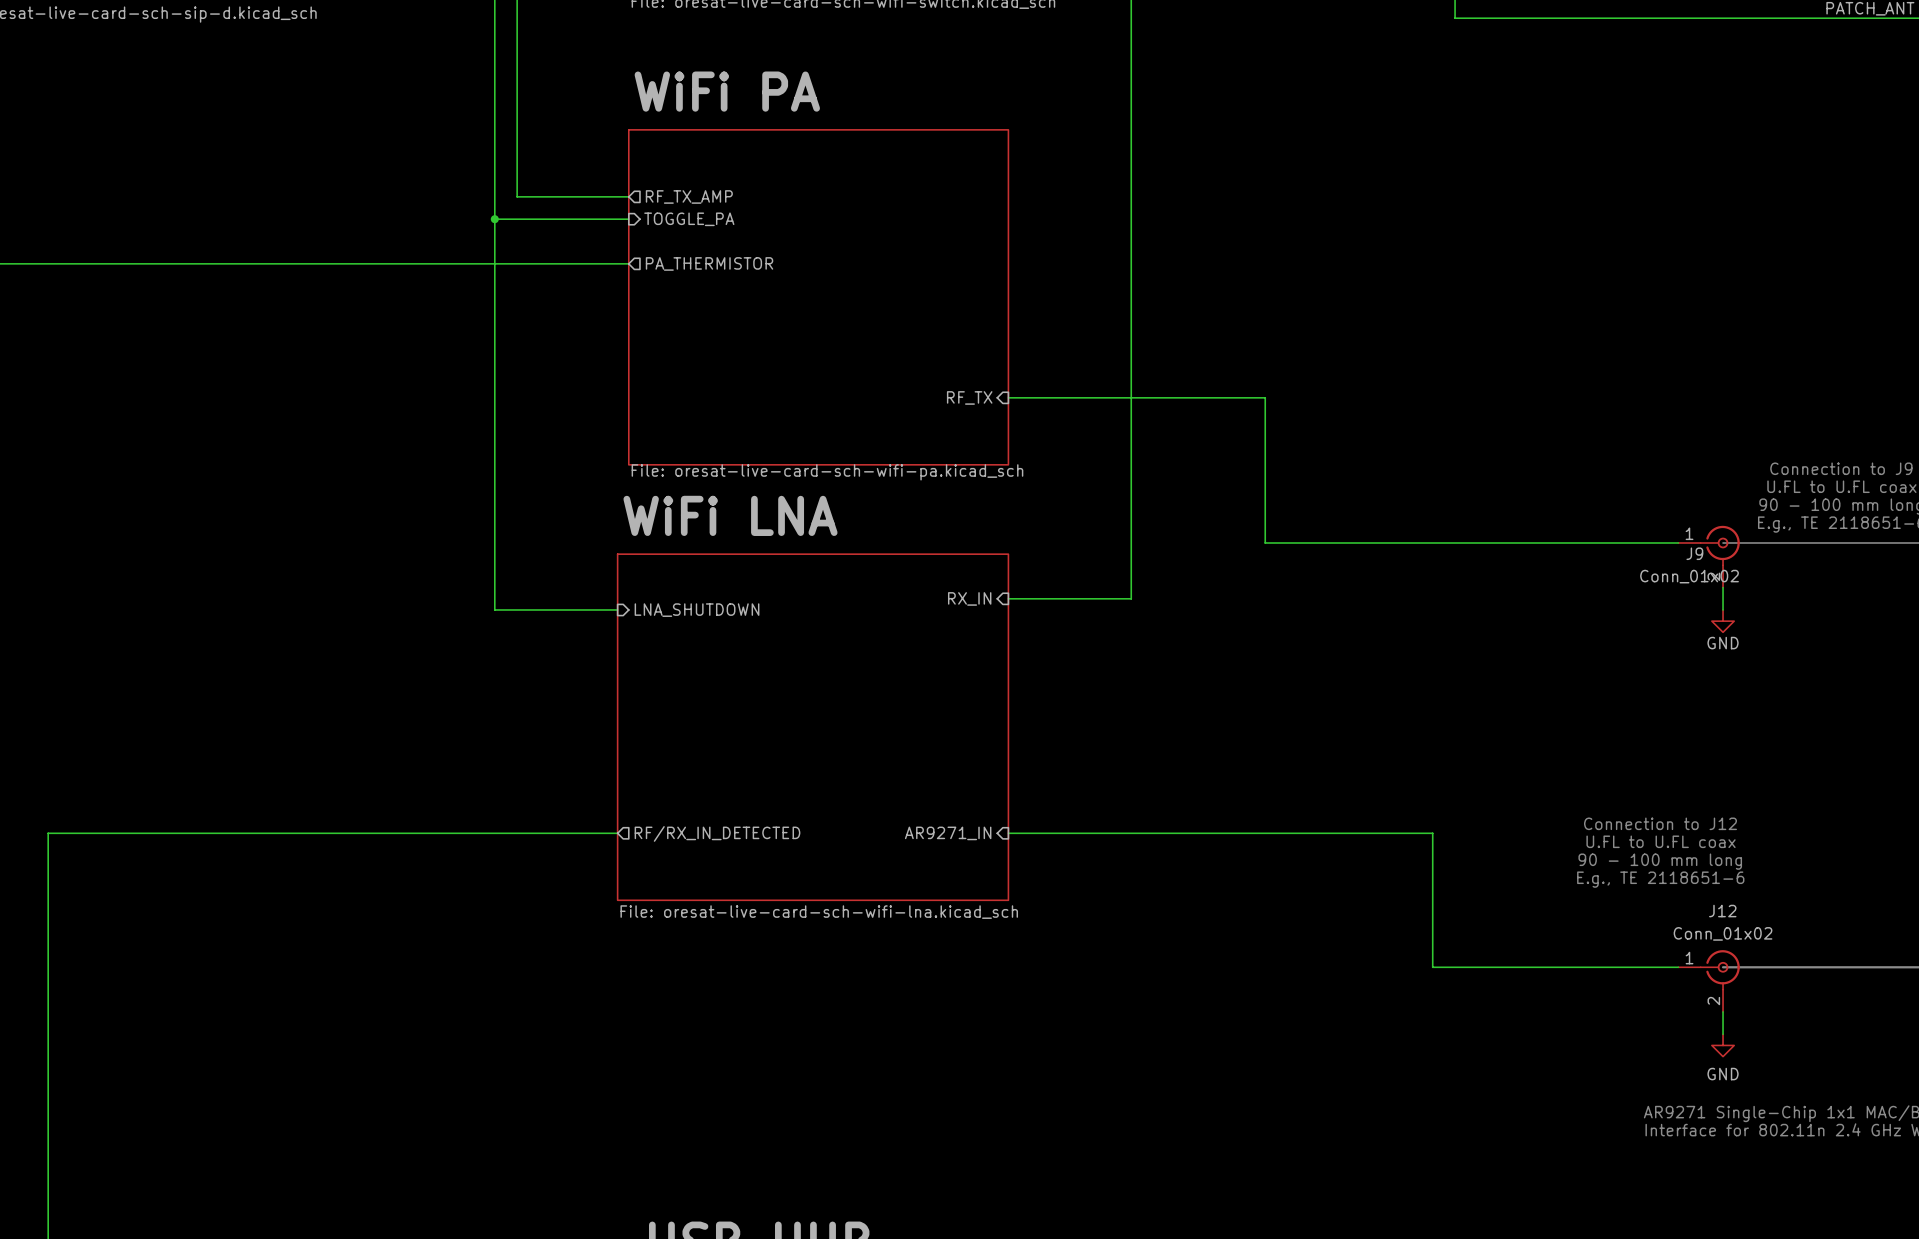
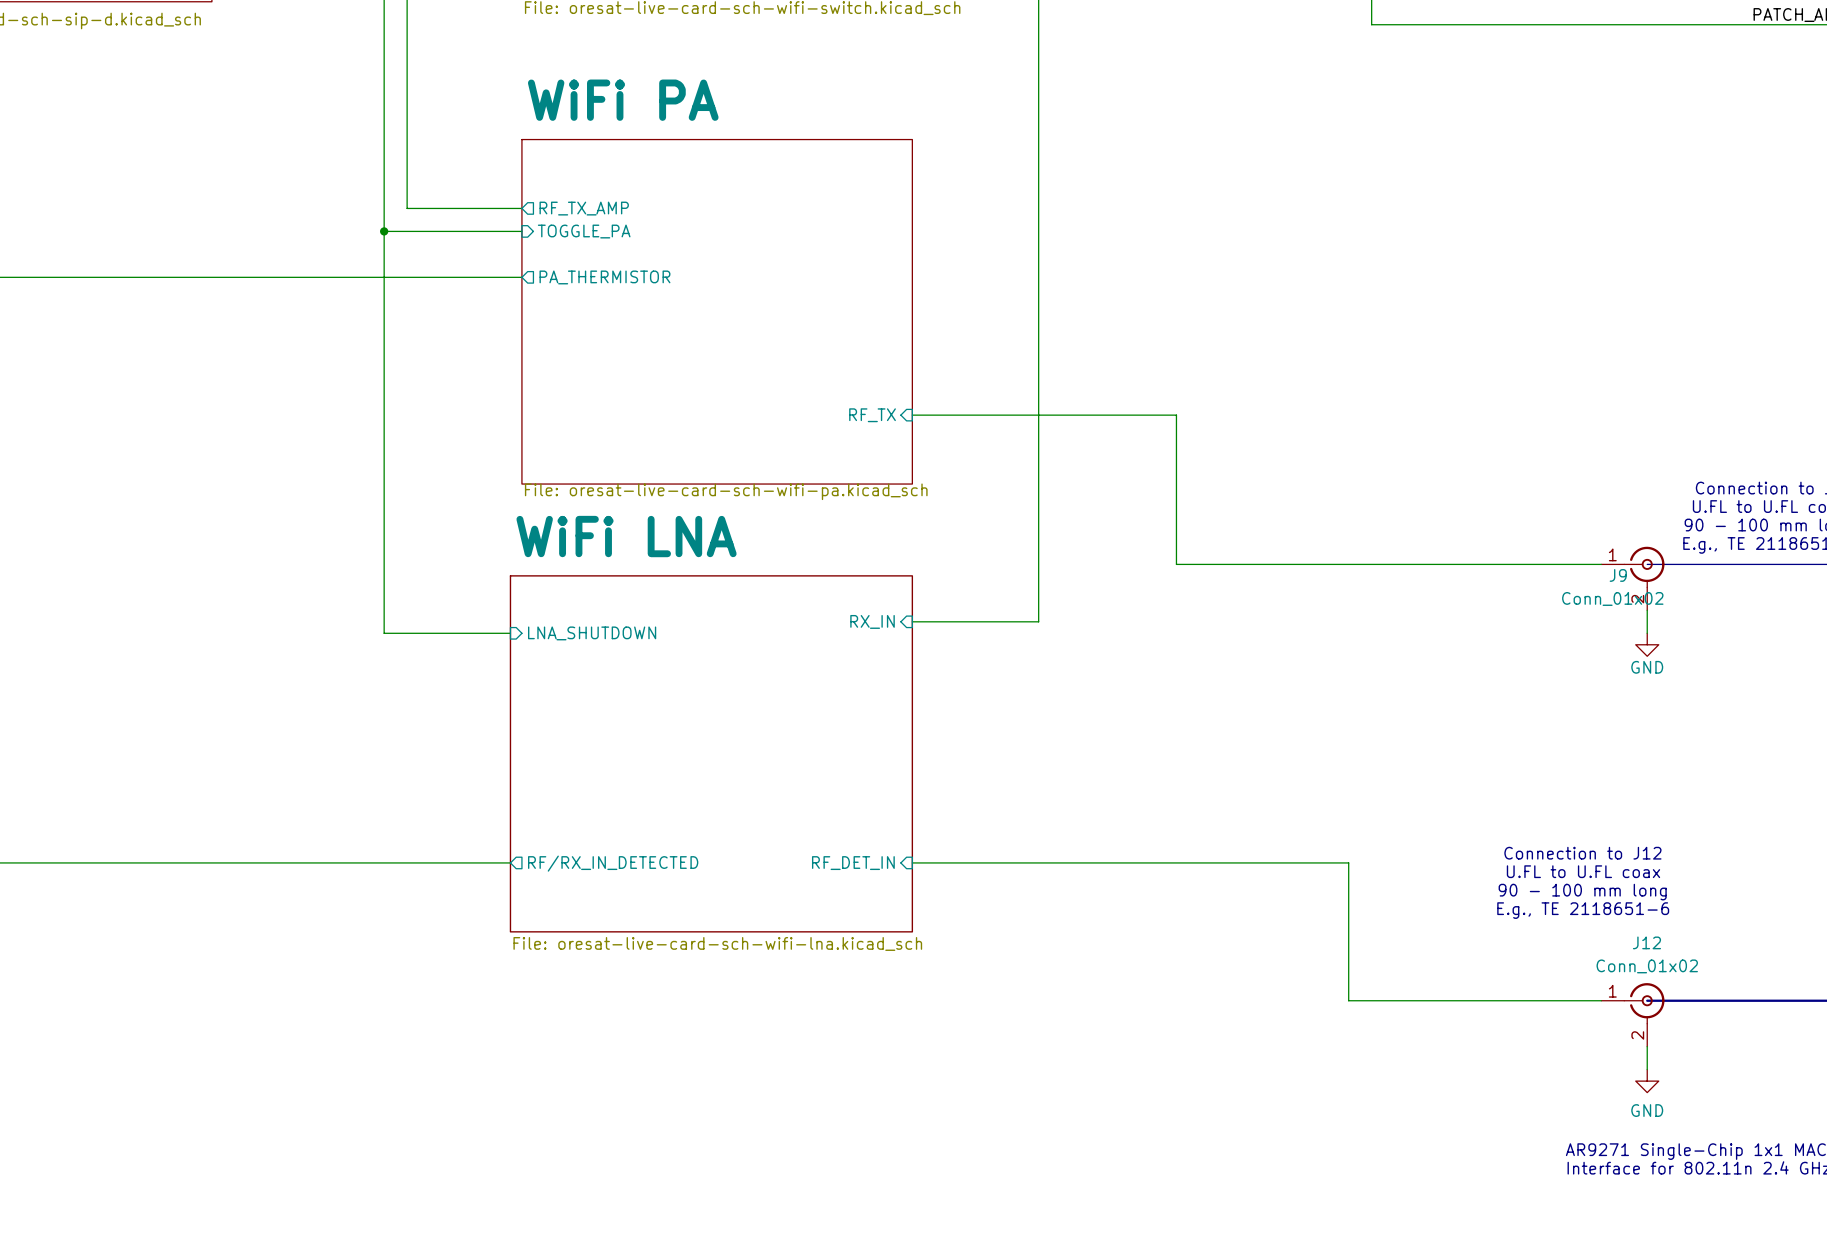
sheet pin: AR9271_IN (948, 833) -> RF_DET_IN (853, 863)

